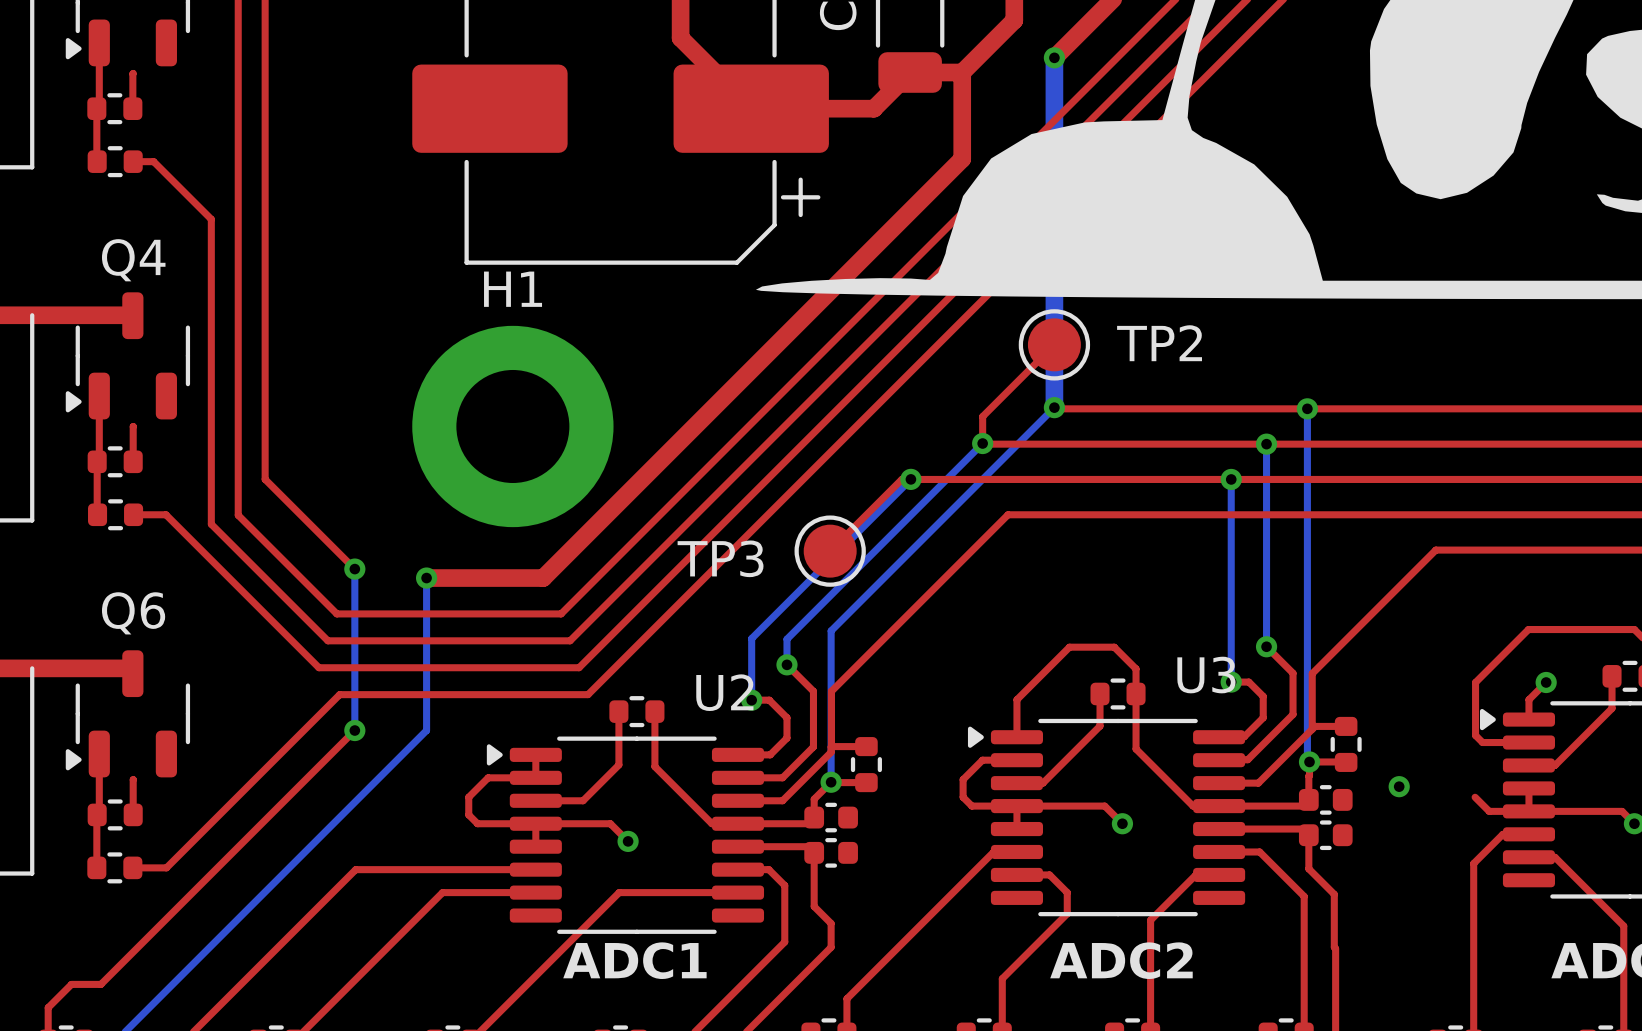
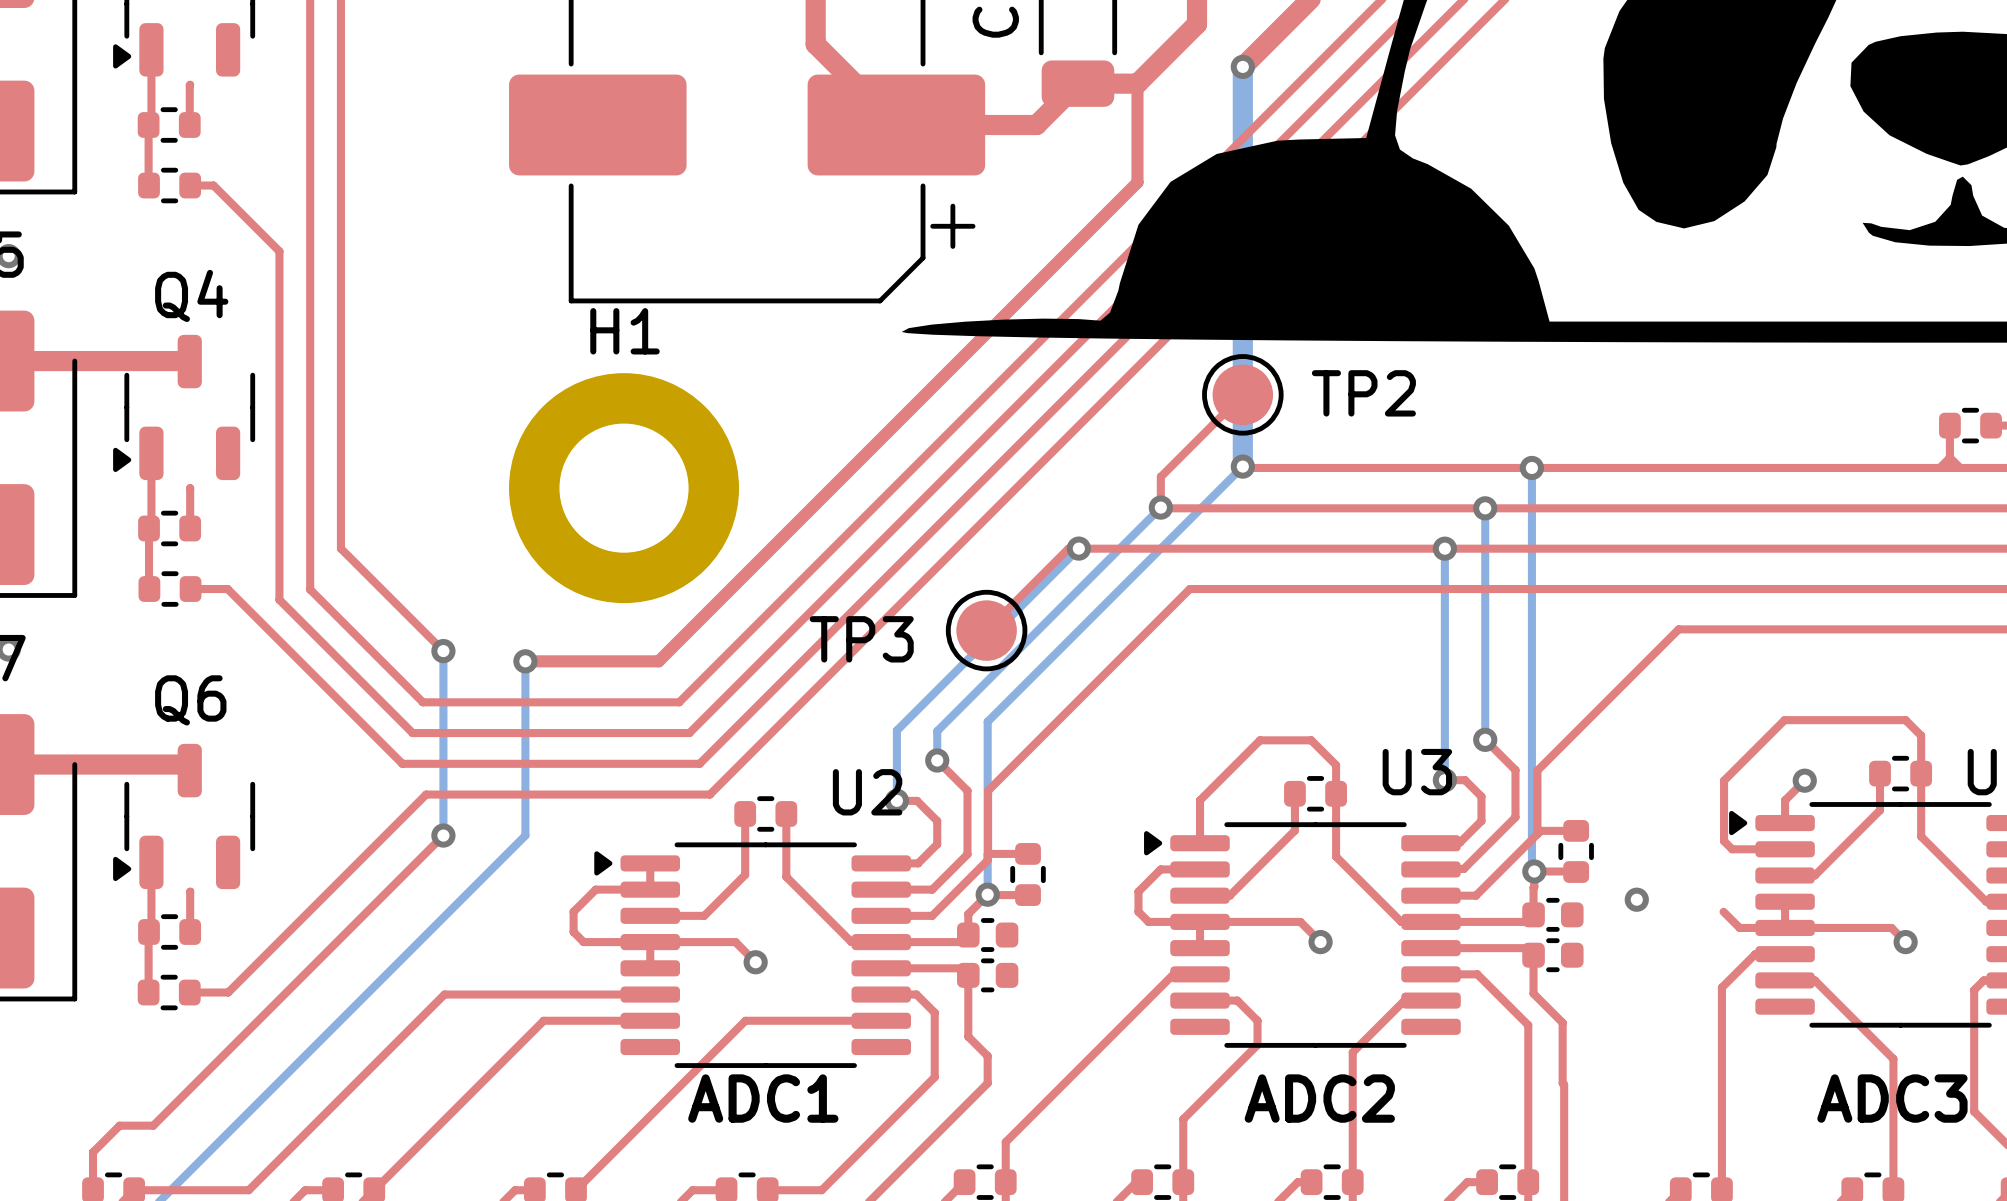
top track width: thick (962, 72) (962, 159) (543, 578) (426, 578) -> thin (1137, 83) (1137, 182) (658, 661) (525, 661)

